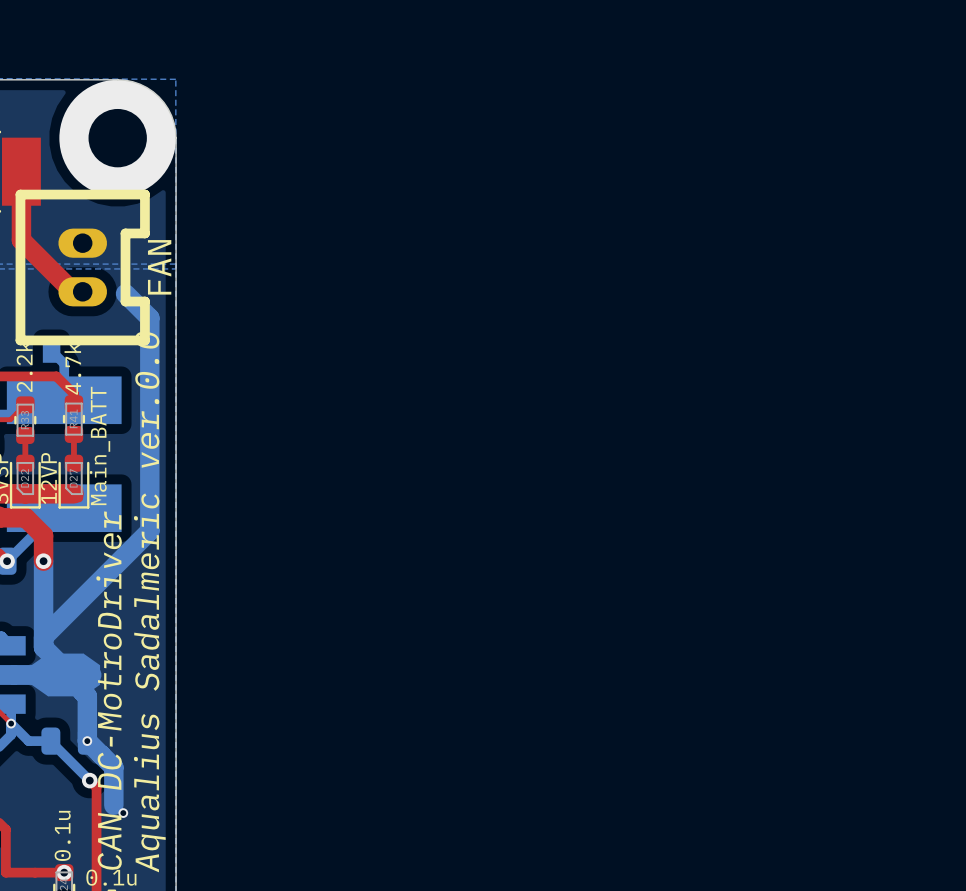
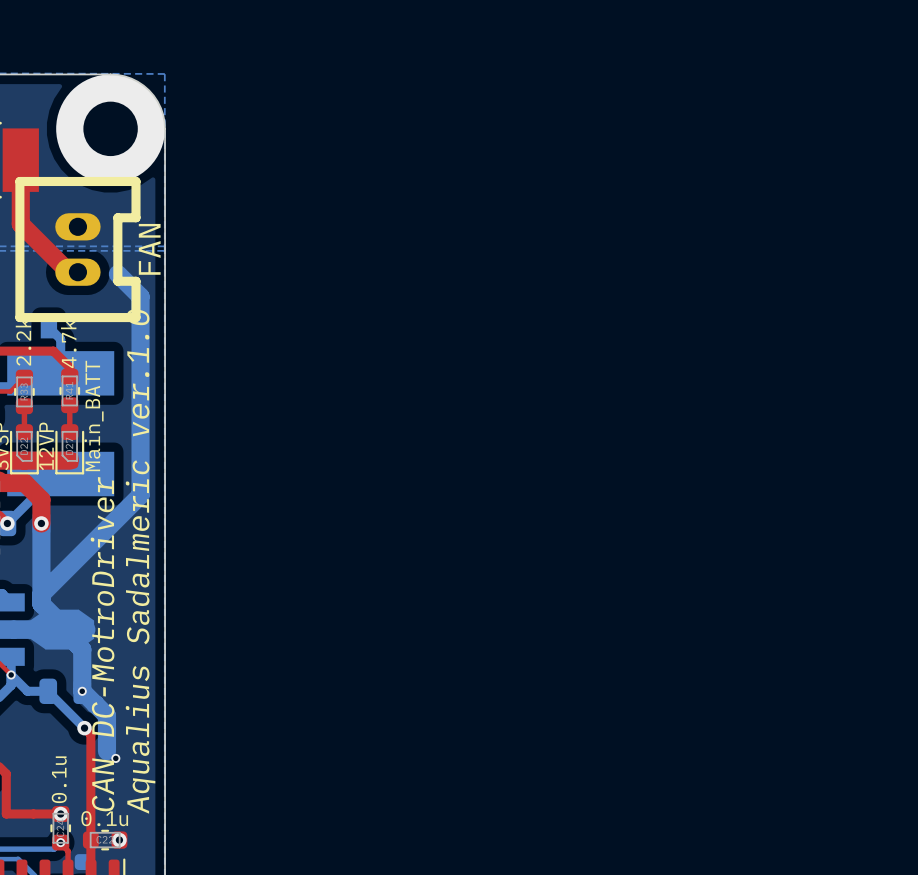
text: Aqualius Sadalmeric ver.0.0 (149, 602) -> Aqualius Sadalmeric ver.1.0 (140, 561)

